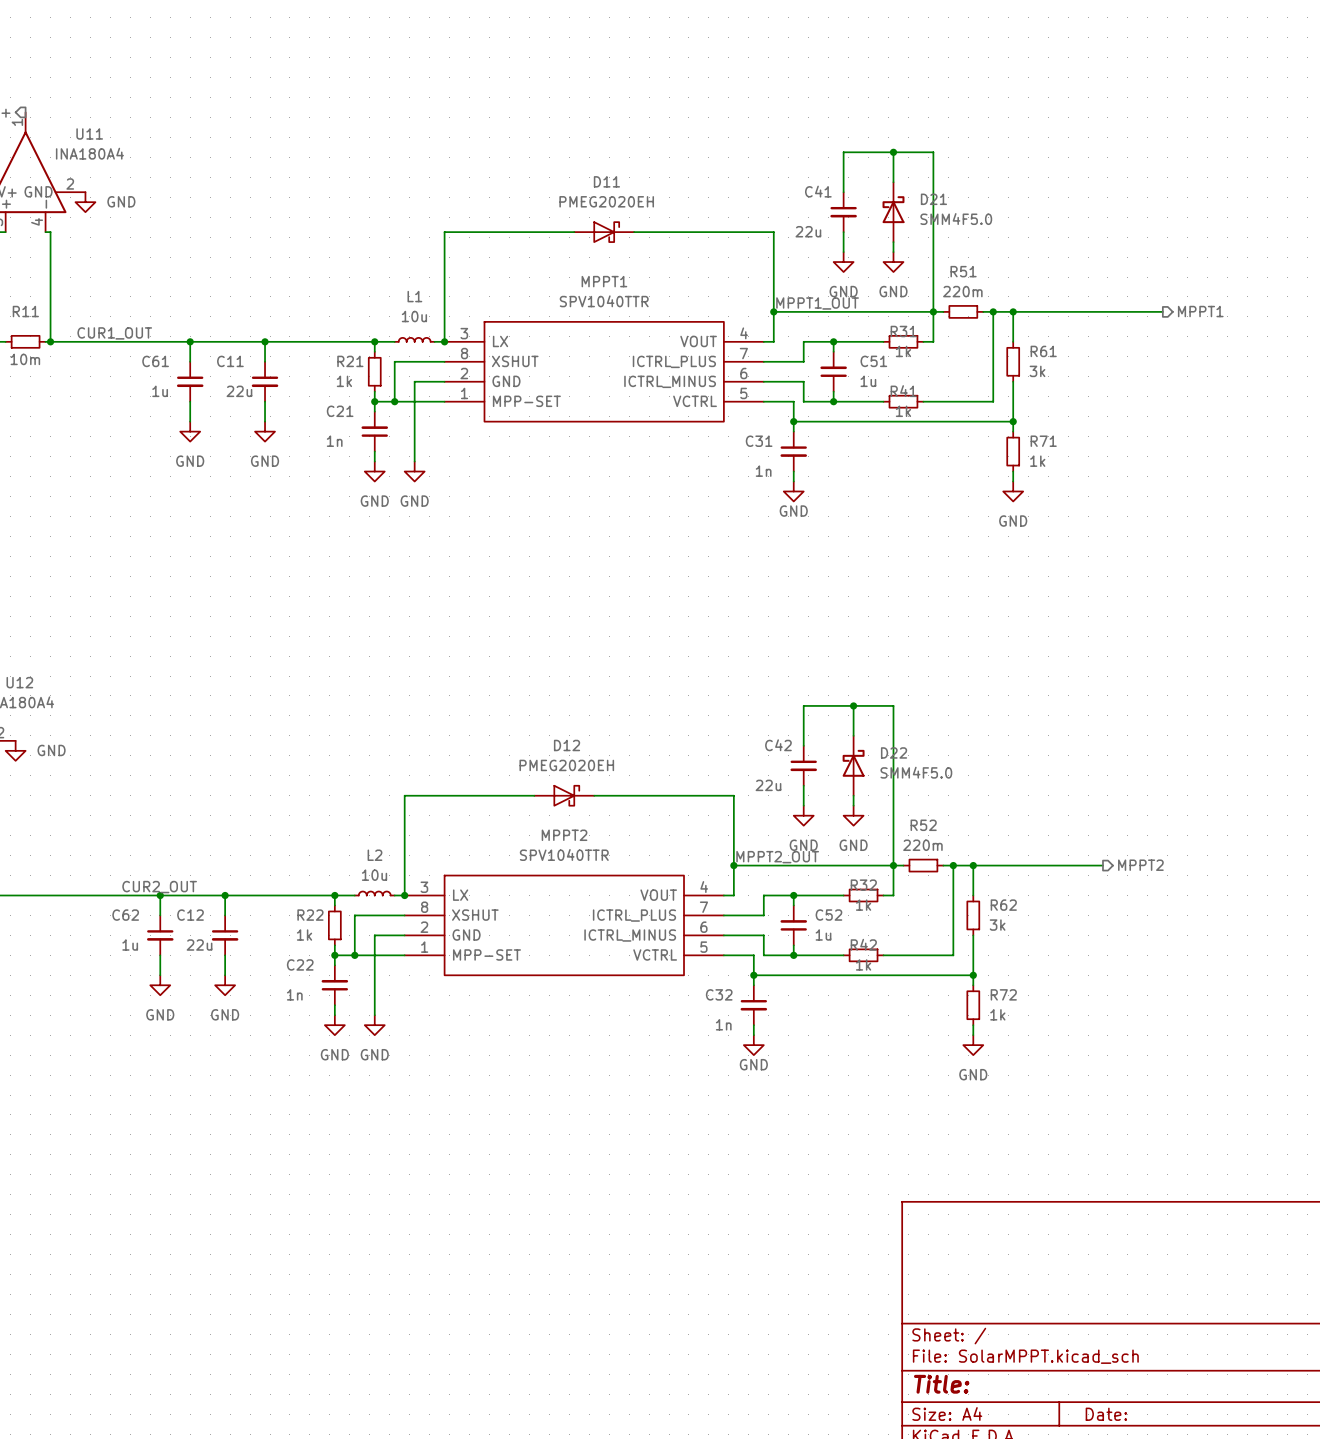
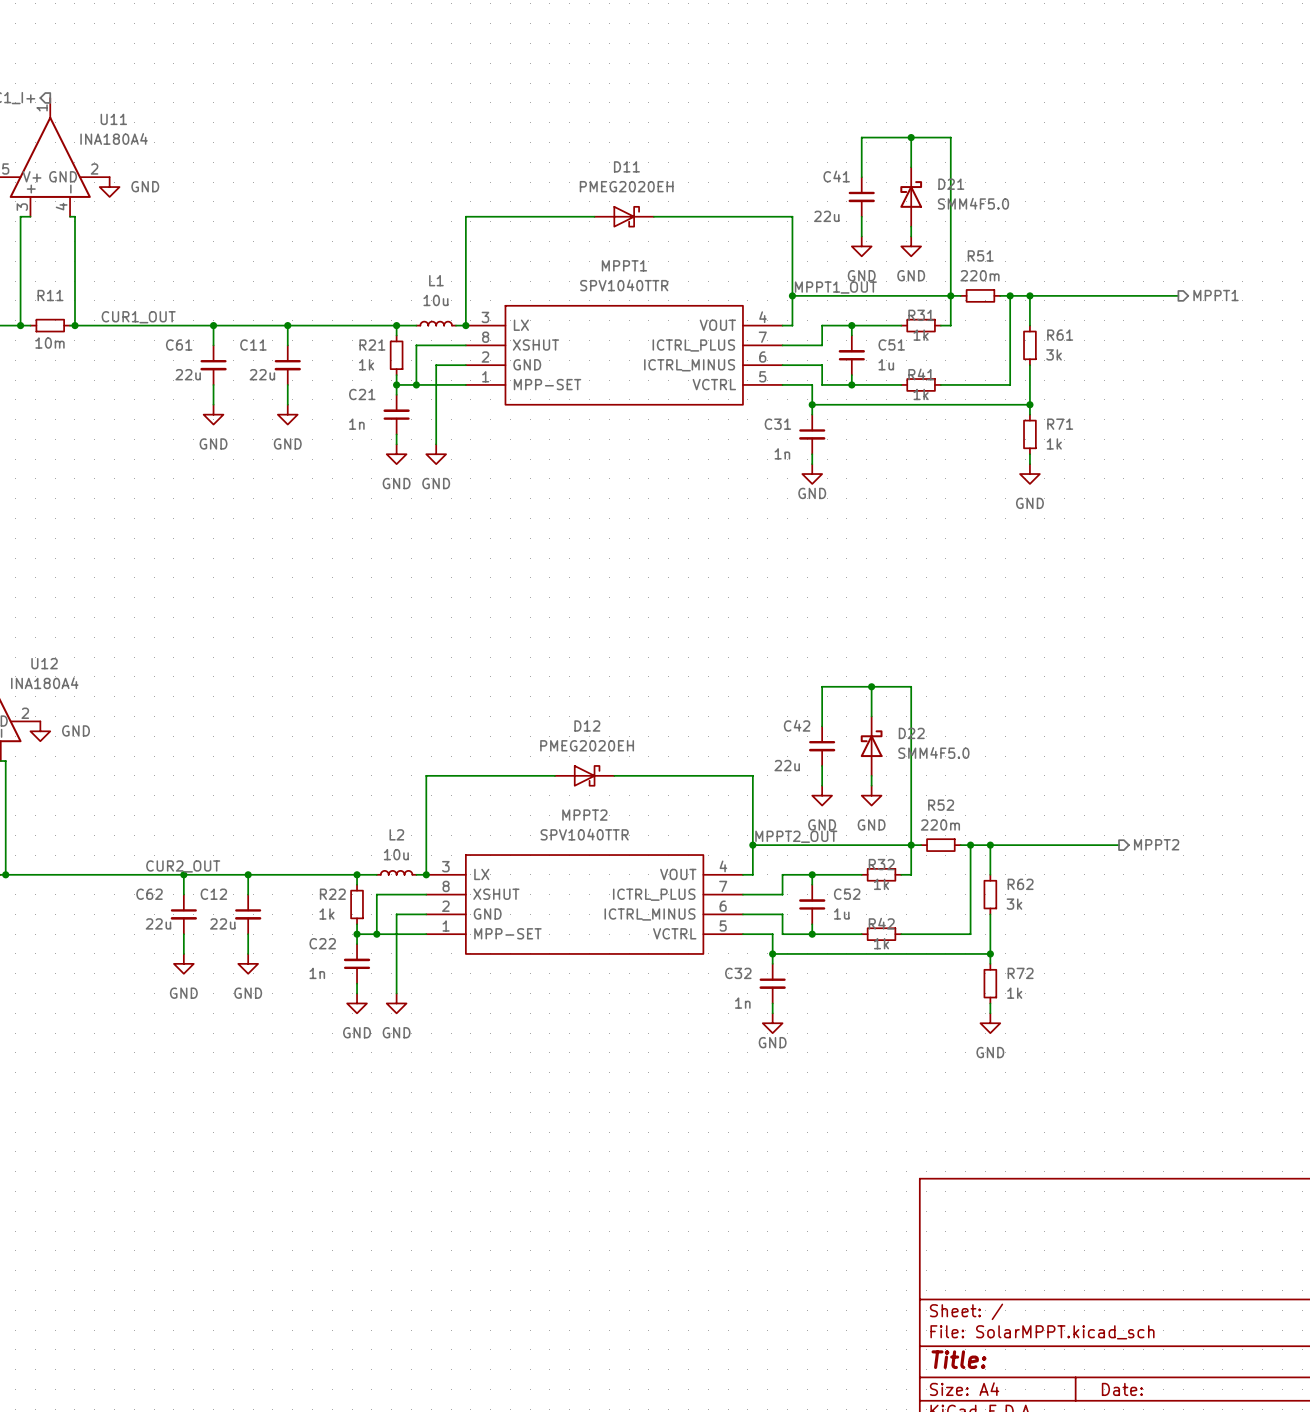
C61 value: 1u (160, 391) -> 22u (188, 374)
C62 value: 1u (130, 945) -> 22u (158, 923)

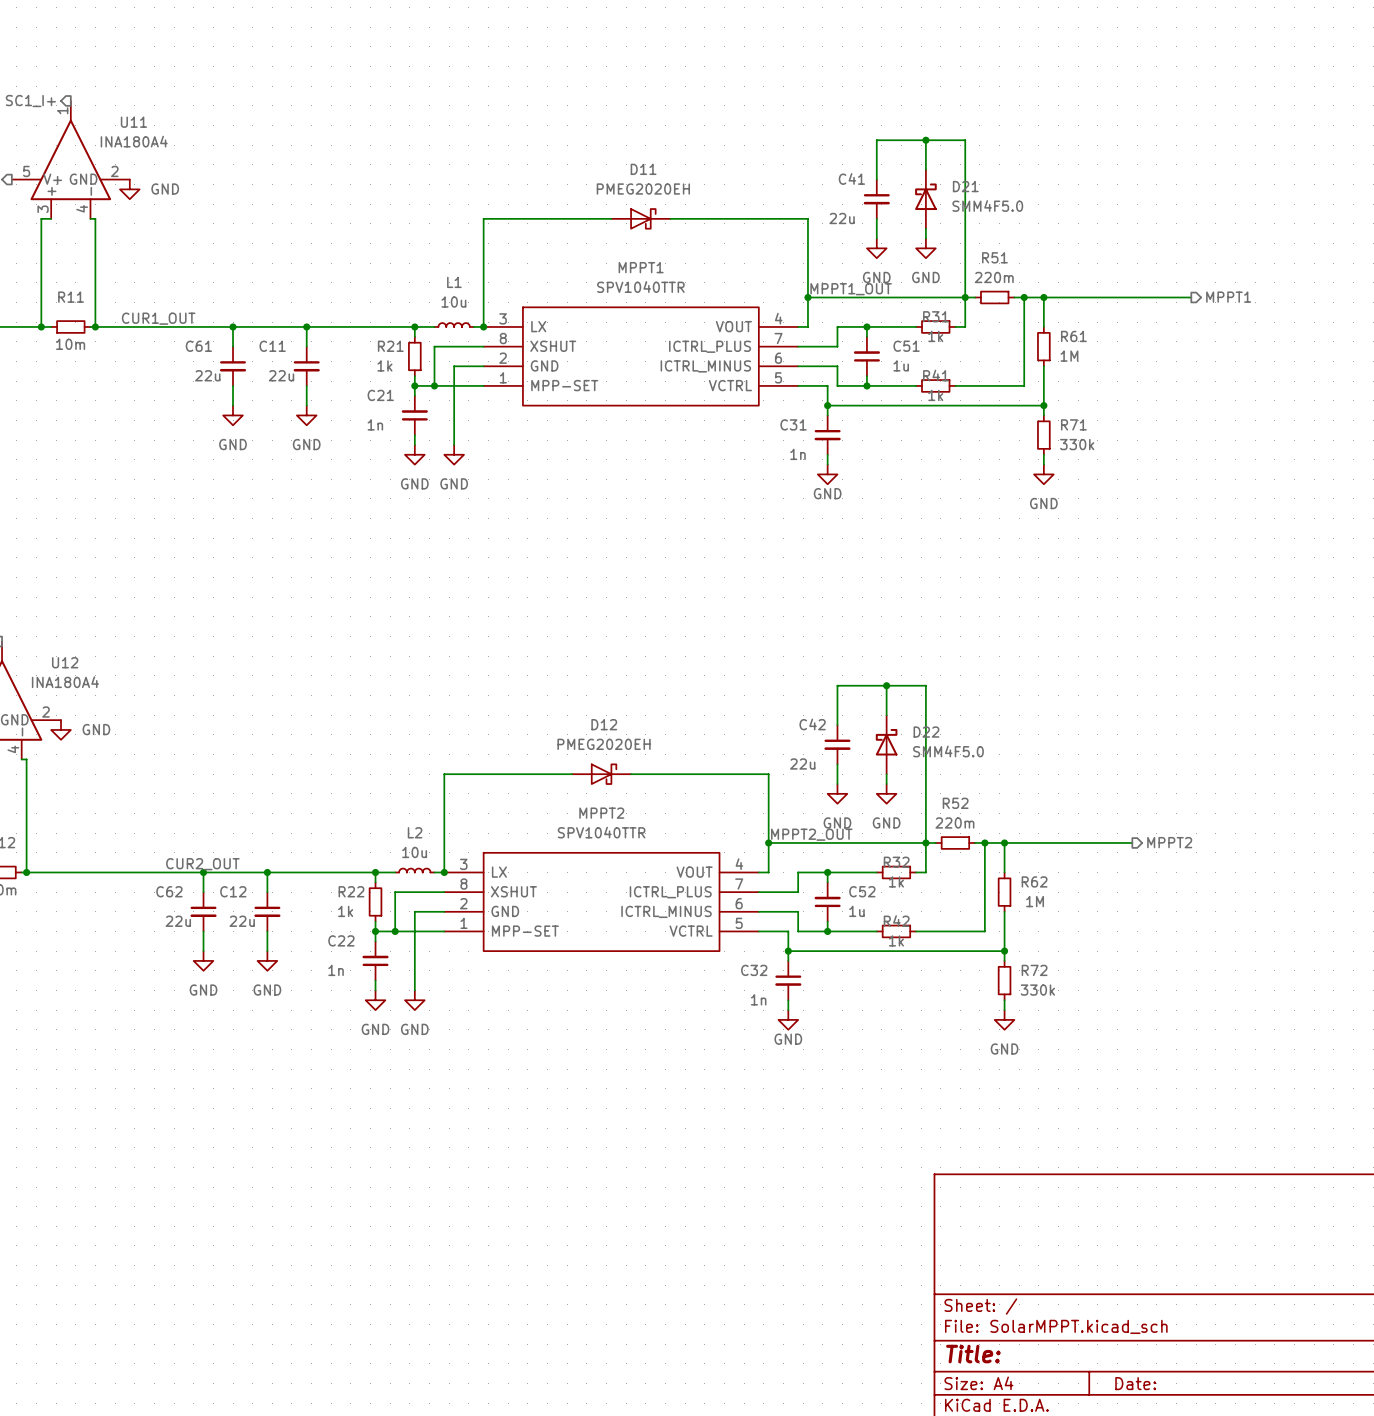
R61 value: 3k (1054, 354) -> 1M (1069, 356)
R71 value: 1k (1054, 443) -> 330k (1077, 444)
R62 value: 3k (1014, 904) -> 1M (1035, 901)
R72 value: 1k (1014, 993) -> 330k (1037, 990)

